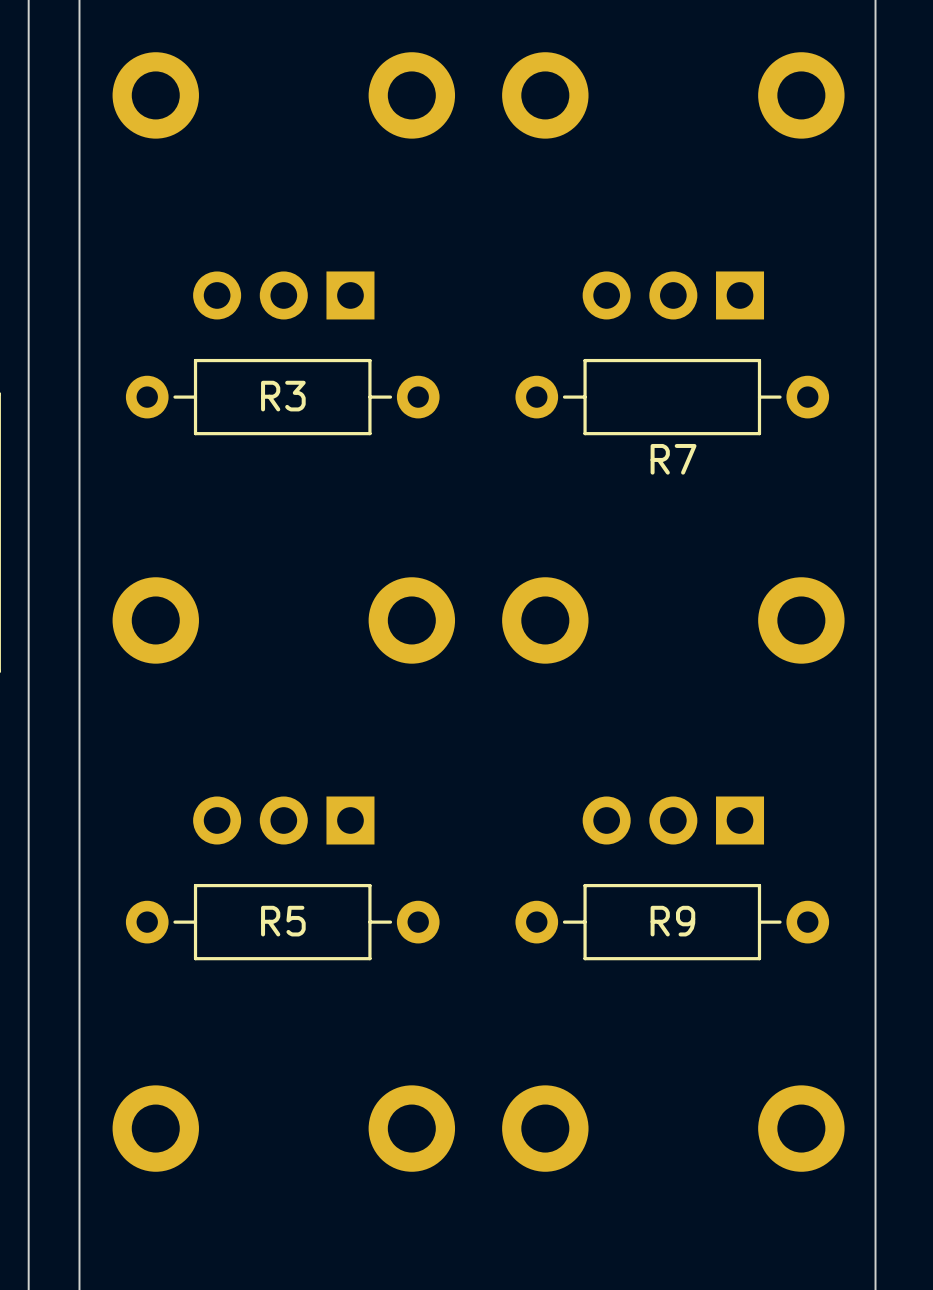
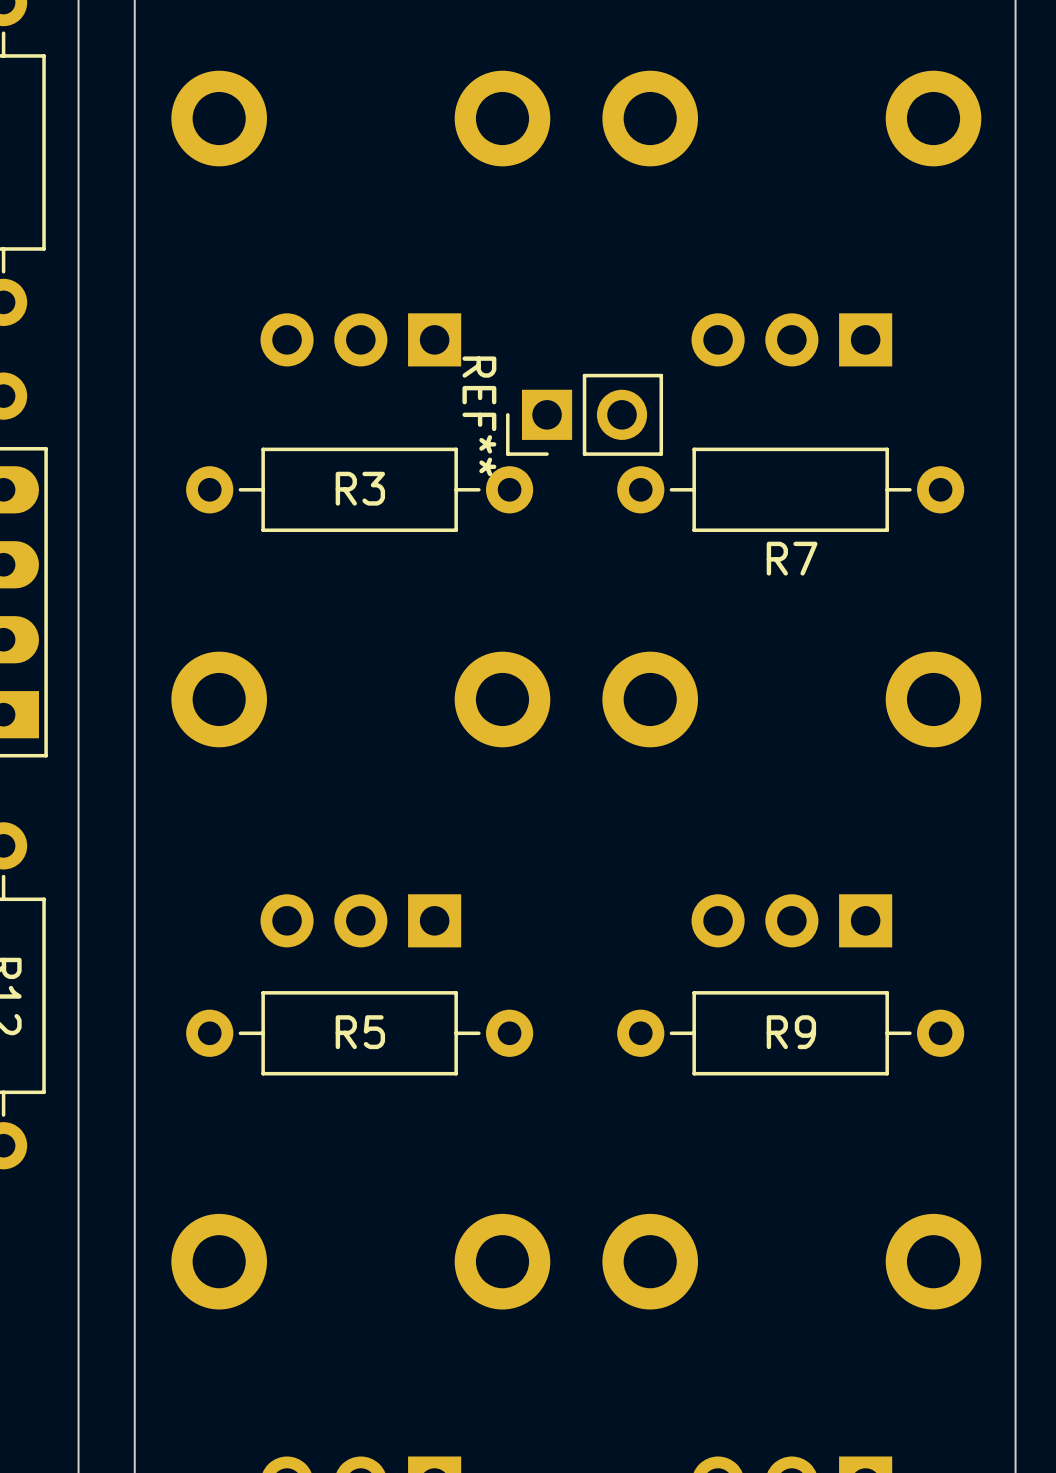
REF**: none -> (584, 414)
R3 position: (282, 397) -> (359, 489)
R7 position: (672, 397) -> (790, 489)

